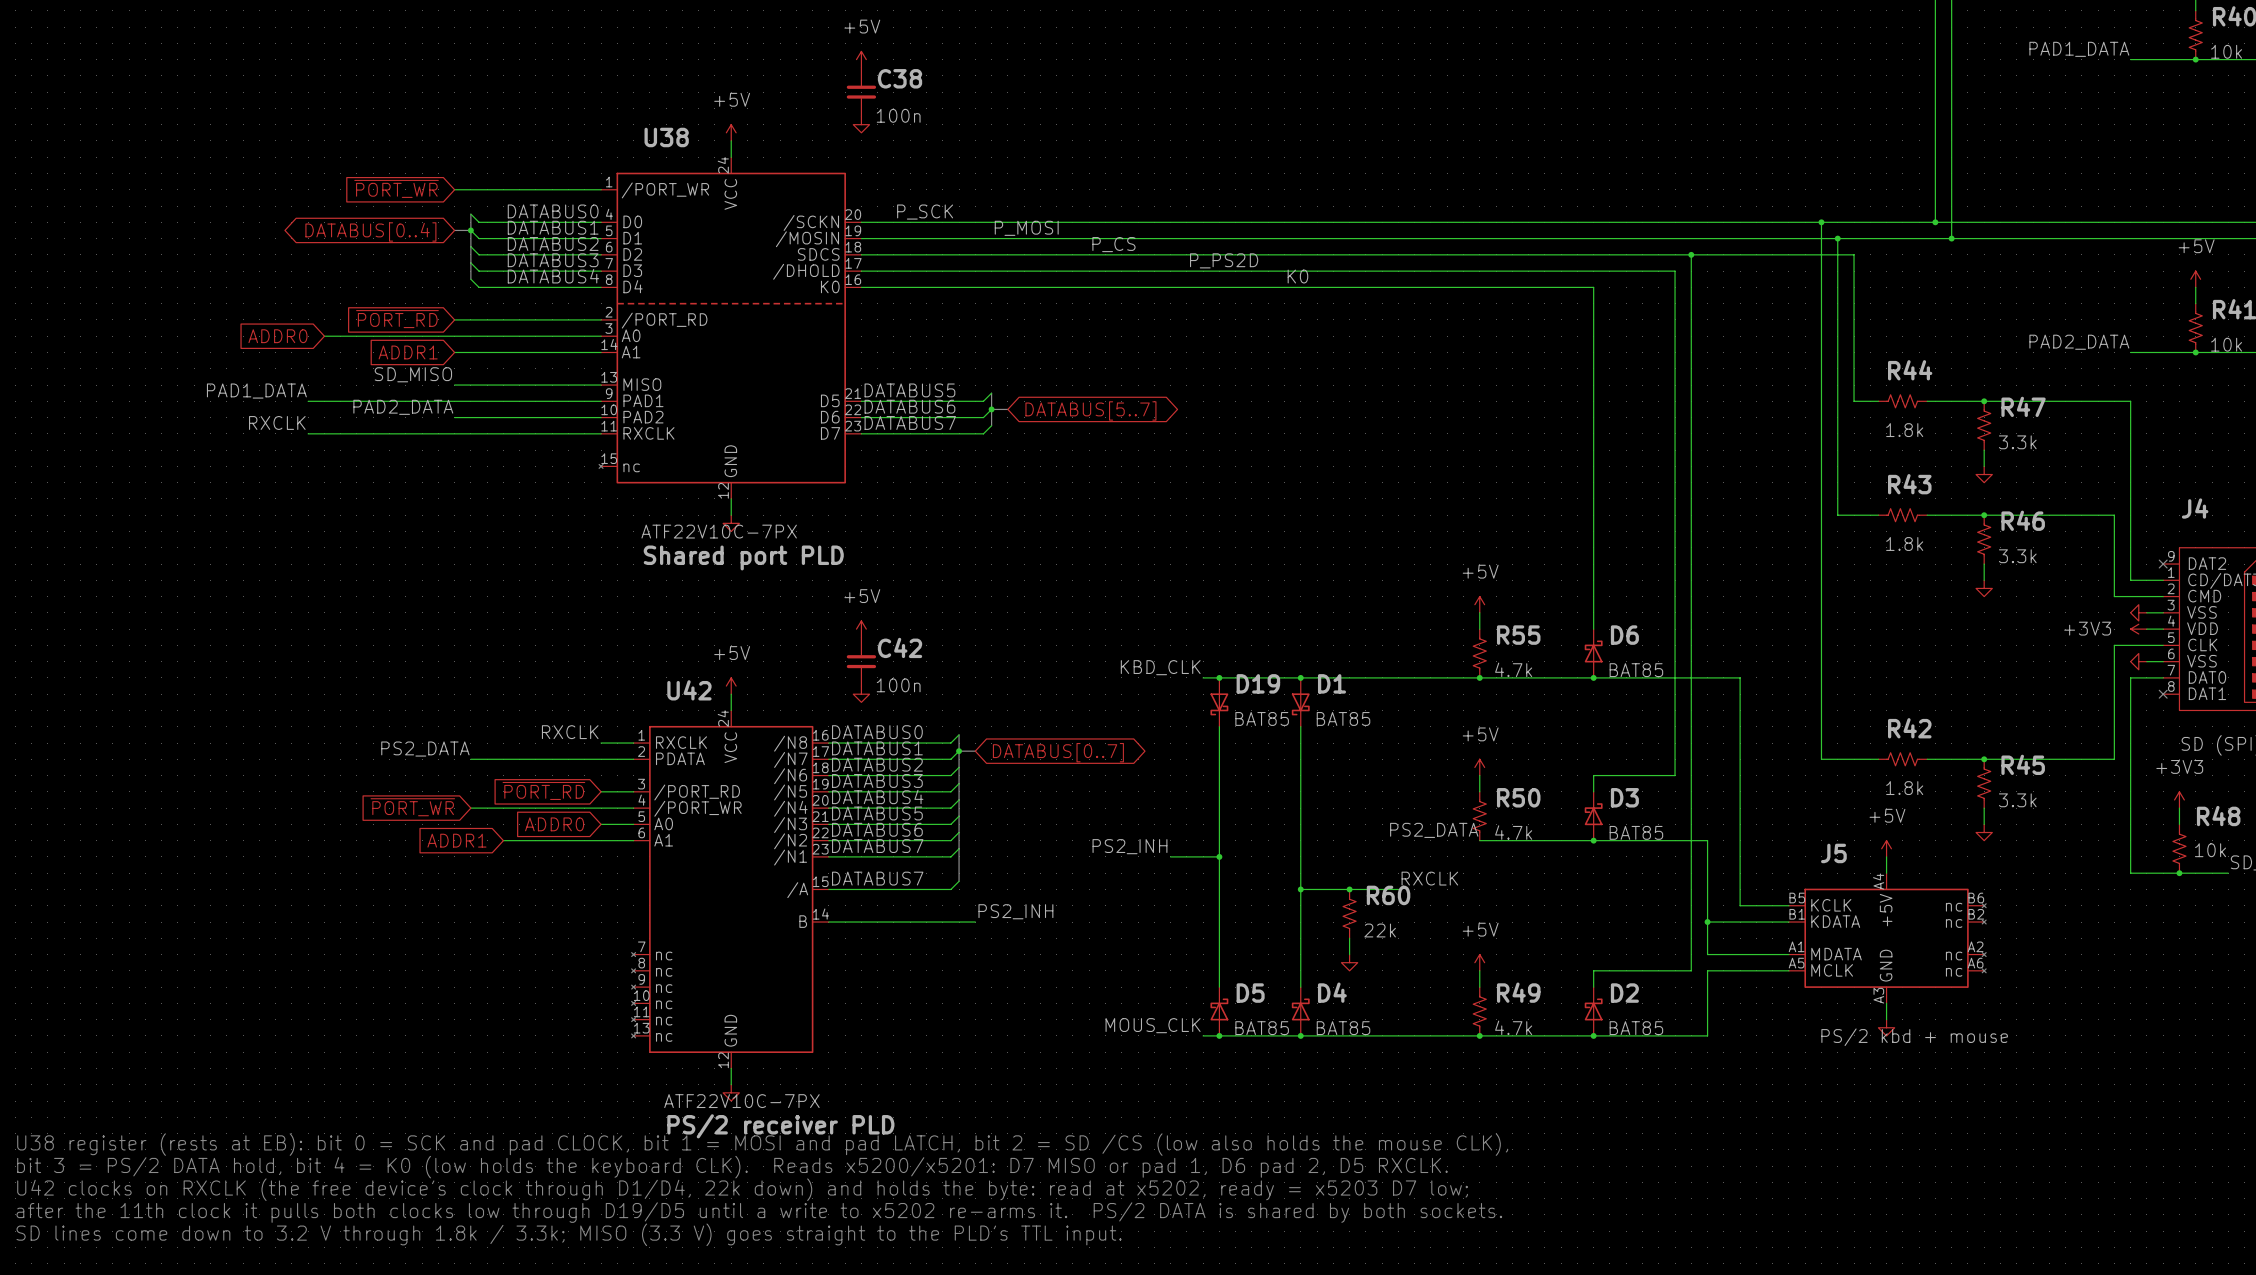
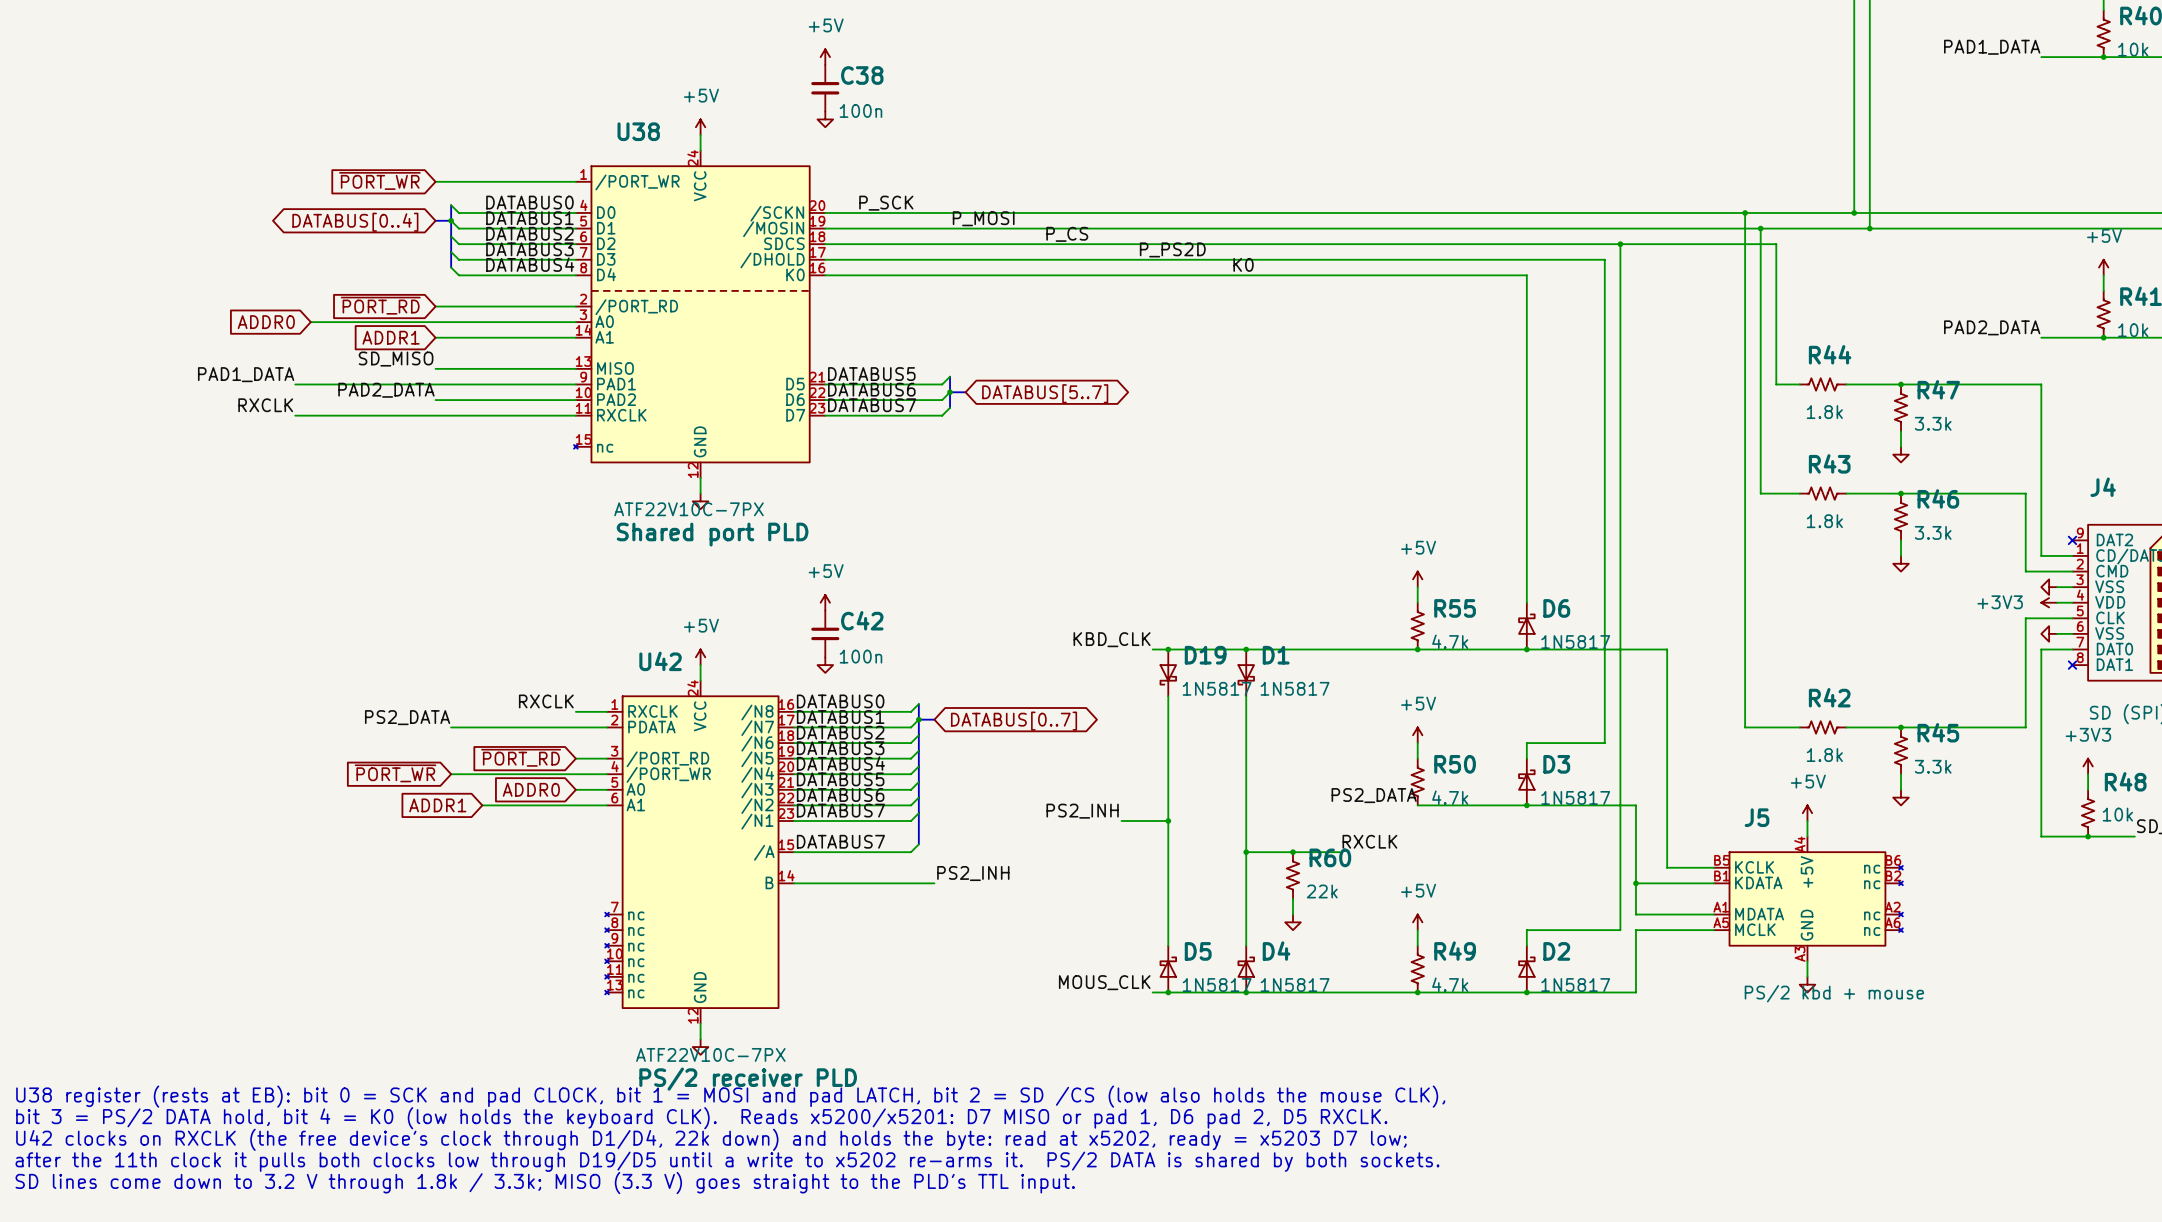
D6 value: BAT85 (1636, 670) -> 1N5817 (1575, 642)
D19 value: BAT85 (1262, 718) -> 1N5817 (1217, 688)
D1 value: BAT85 (1343, 718) -> 1N5817 (1295, 688)
D3 value: BAT85 (1636, 832) -> 1N5817 (1575, 797)
D5 value: BAT85 (1262, 1028) -> 1N5817 (1217, 985)
D4 value: BAT85 (1343, 1028) -> 1N5817 (1295, 985)
D2 value: BAT85 (1636, 1028) -> 1N5817 (1575, 985)

